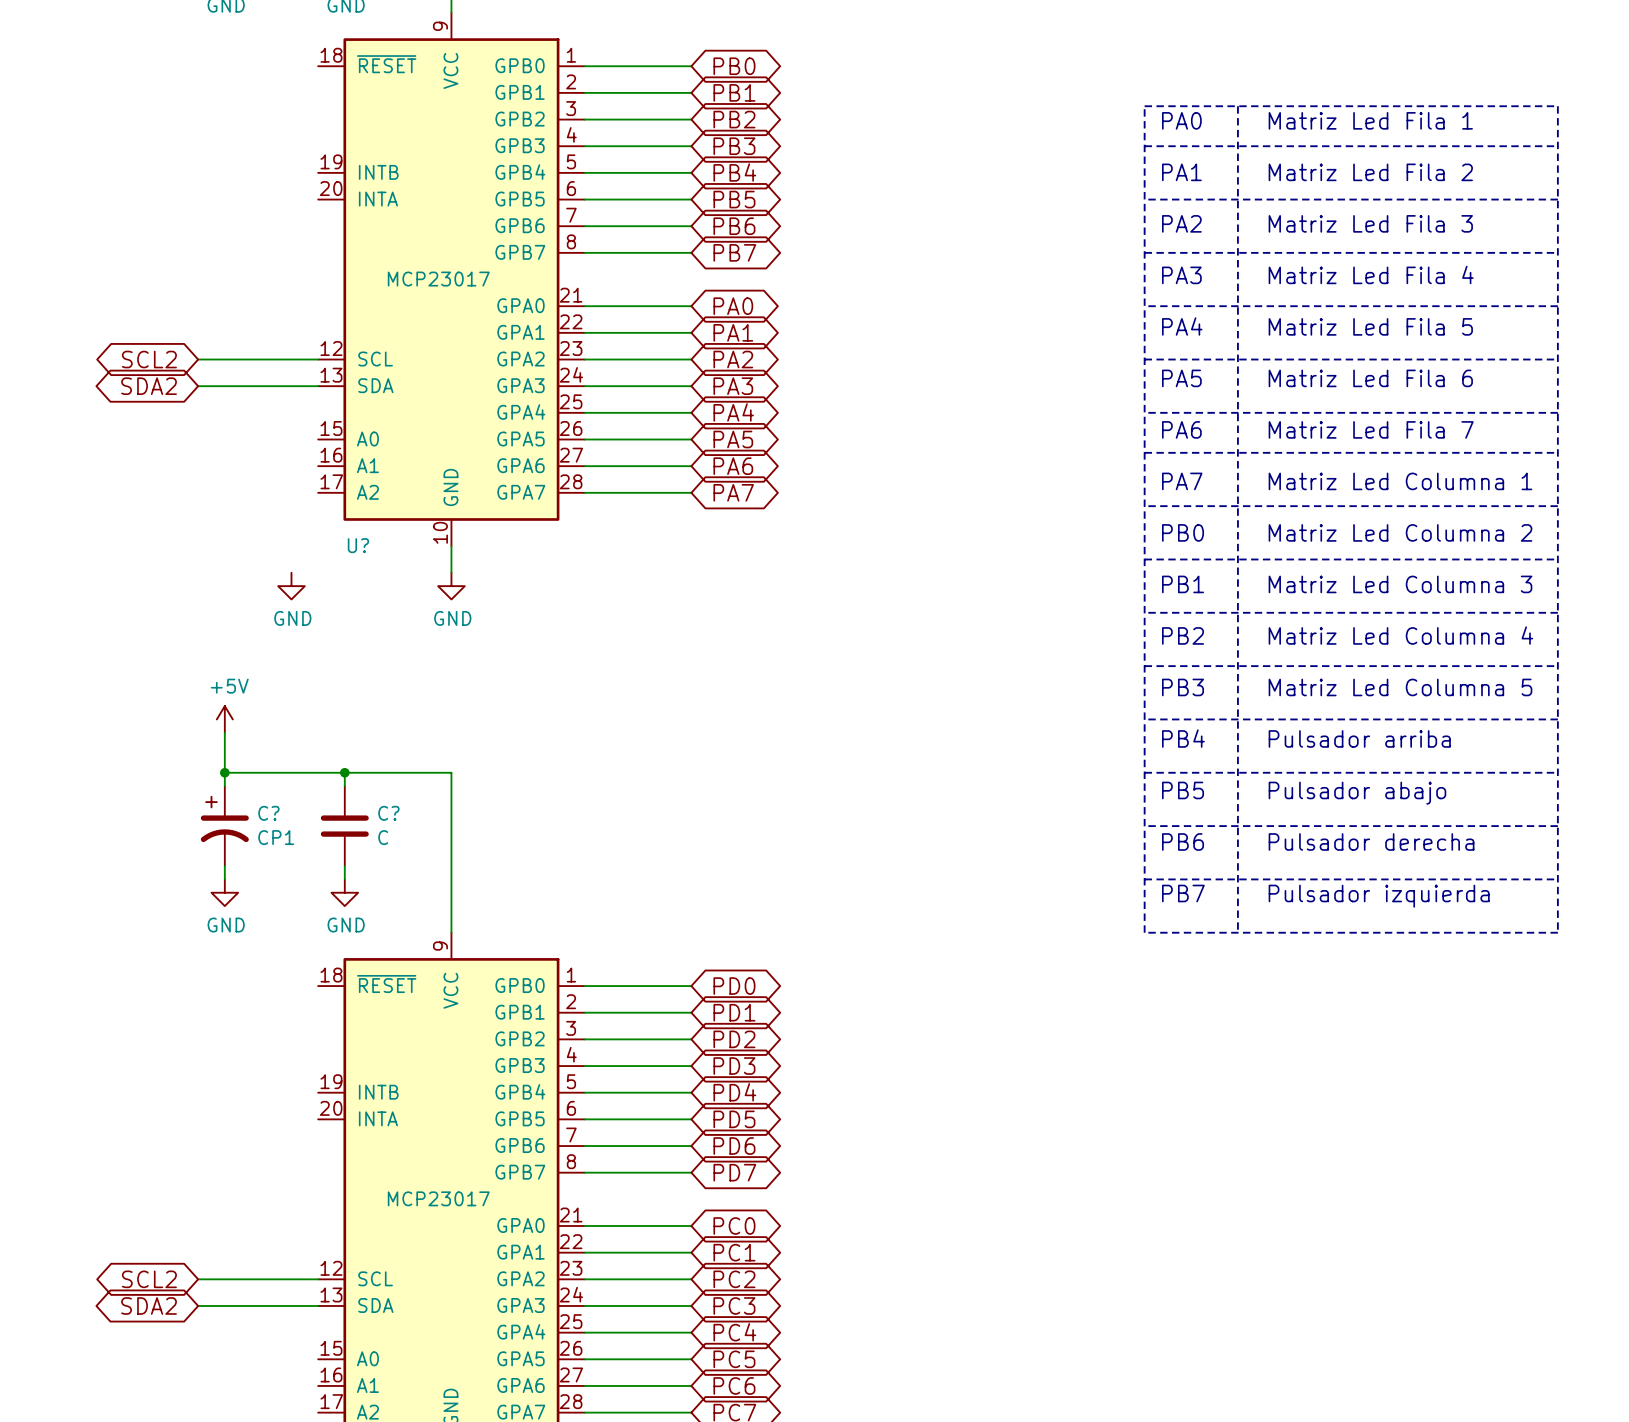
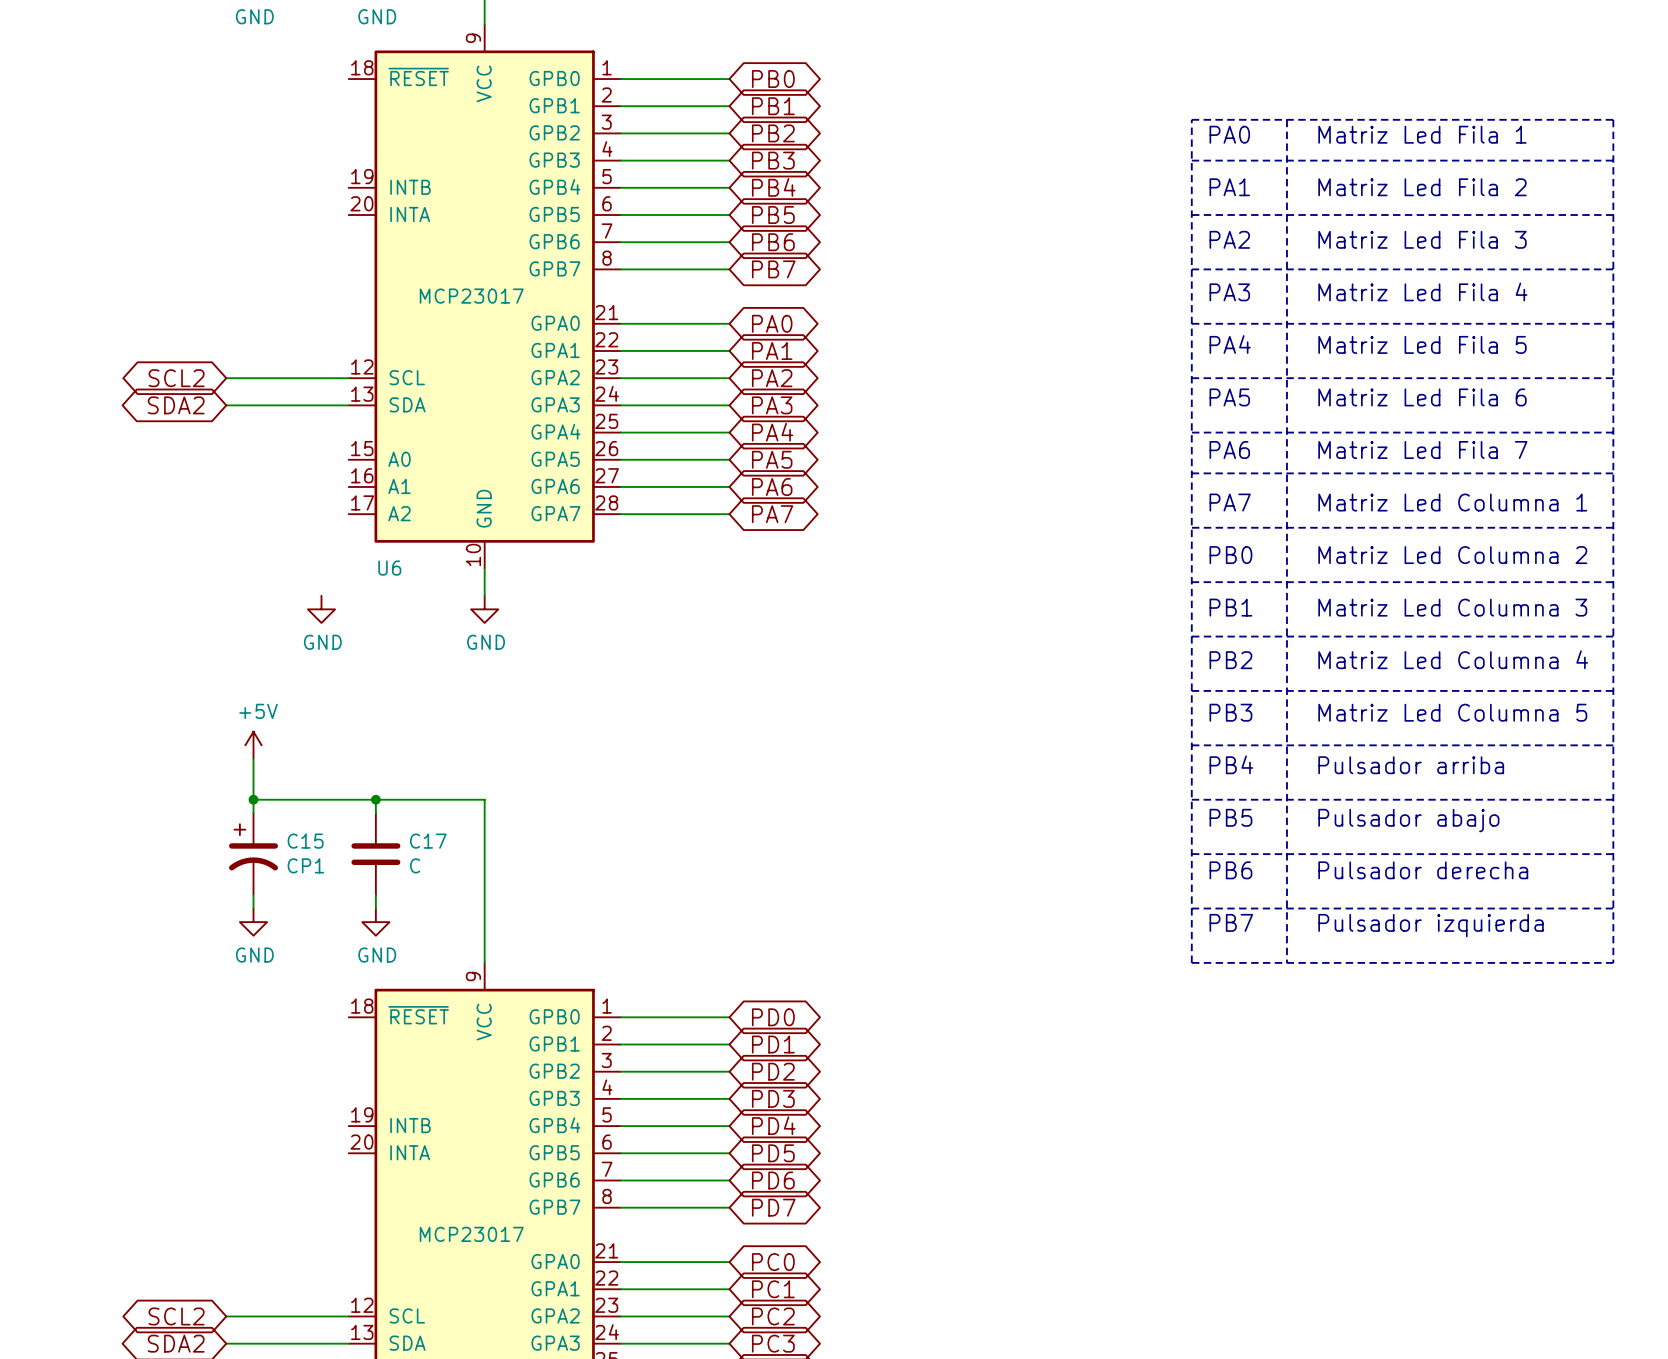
U? name: U? (358, 545) -> U6 (389, 568)
C? name: C? (268, 813) -> C15 (305, 841)
C? name: C? (388, 813) -> C17 (428, 841)

